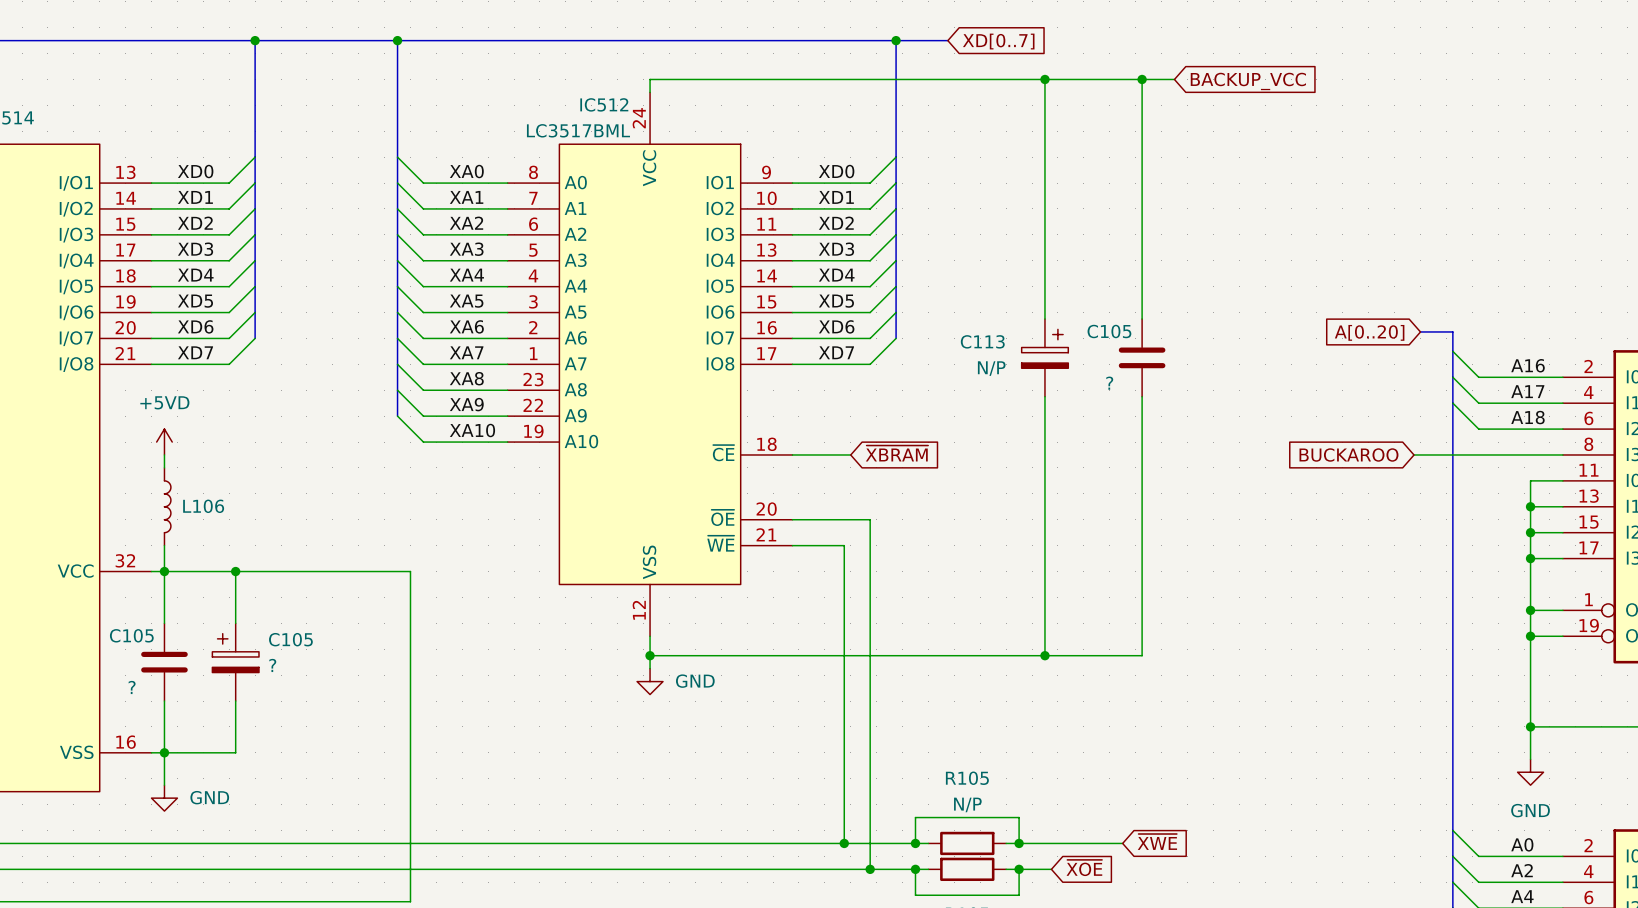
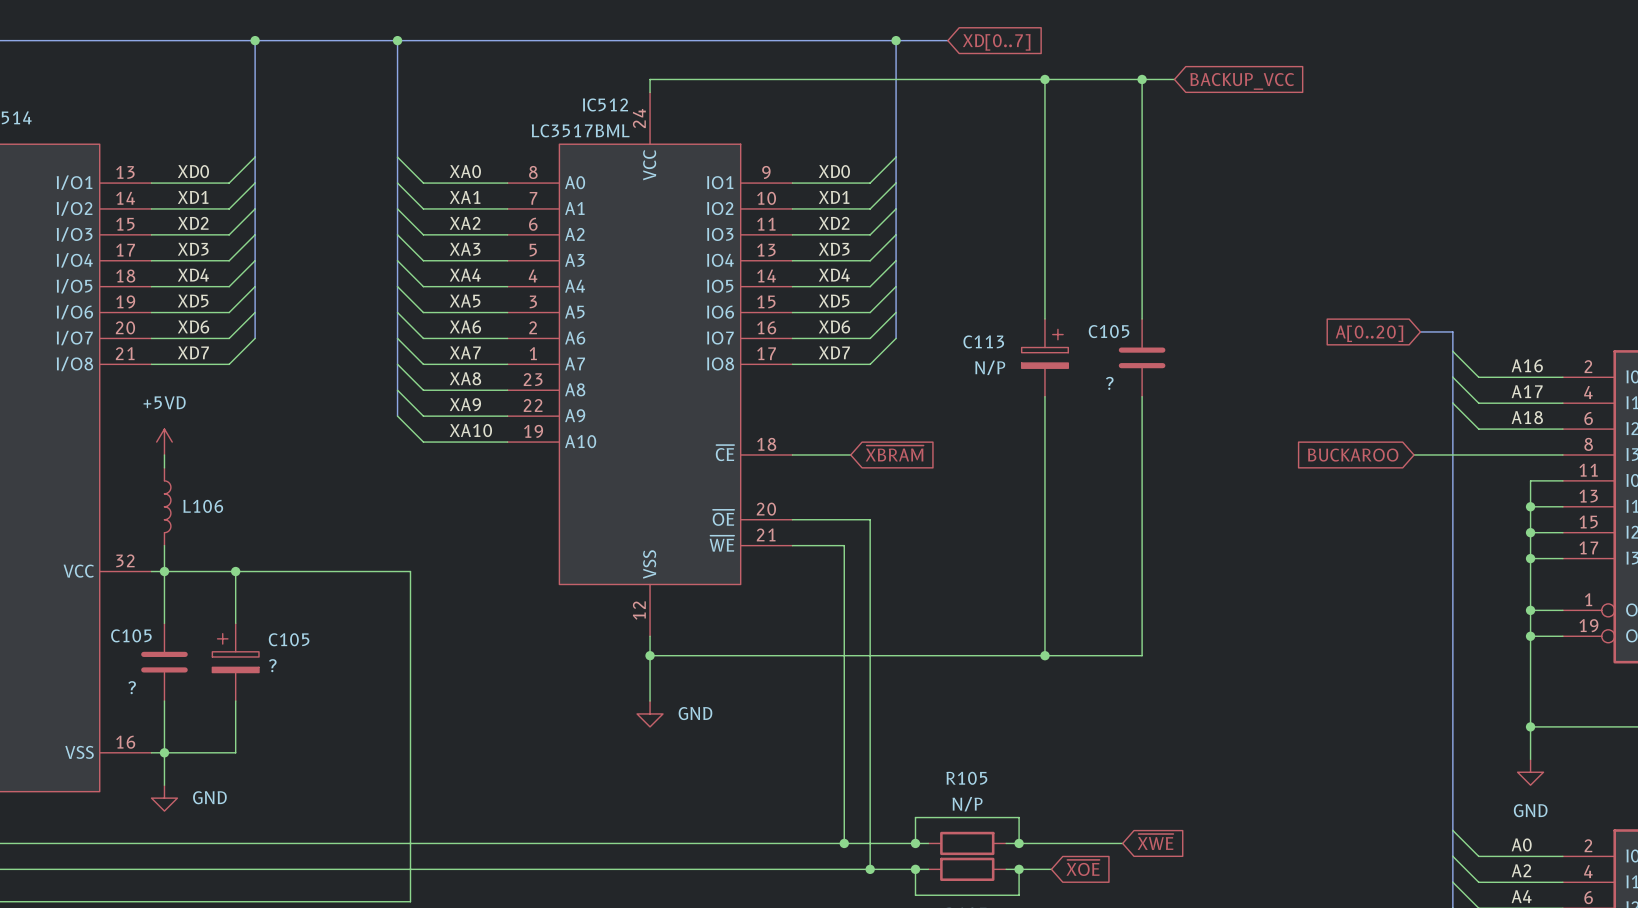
wire: none -> (650, 668) (650, 701)
power symbol position: GND (650, 681) -> GND (650, 713)

